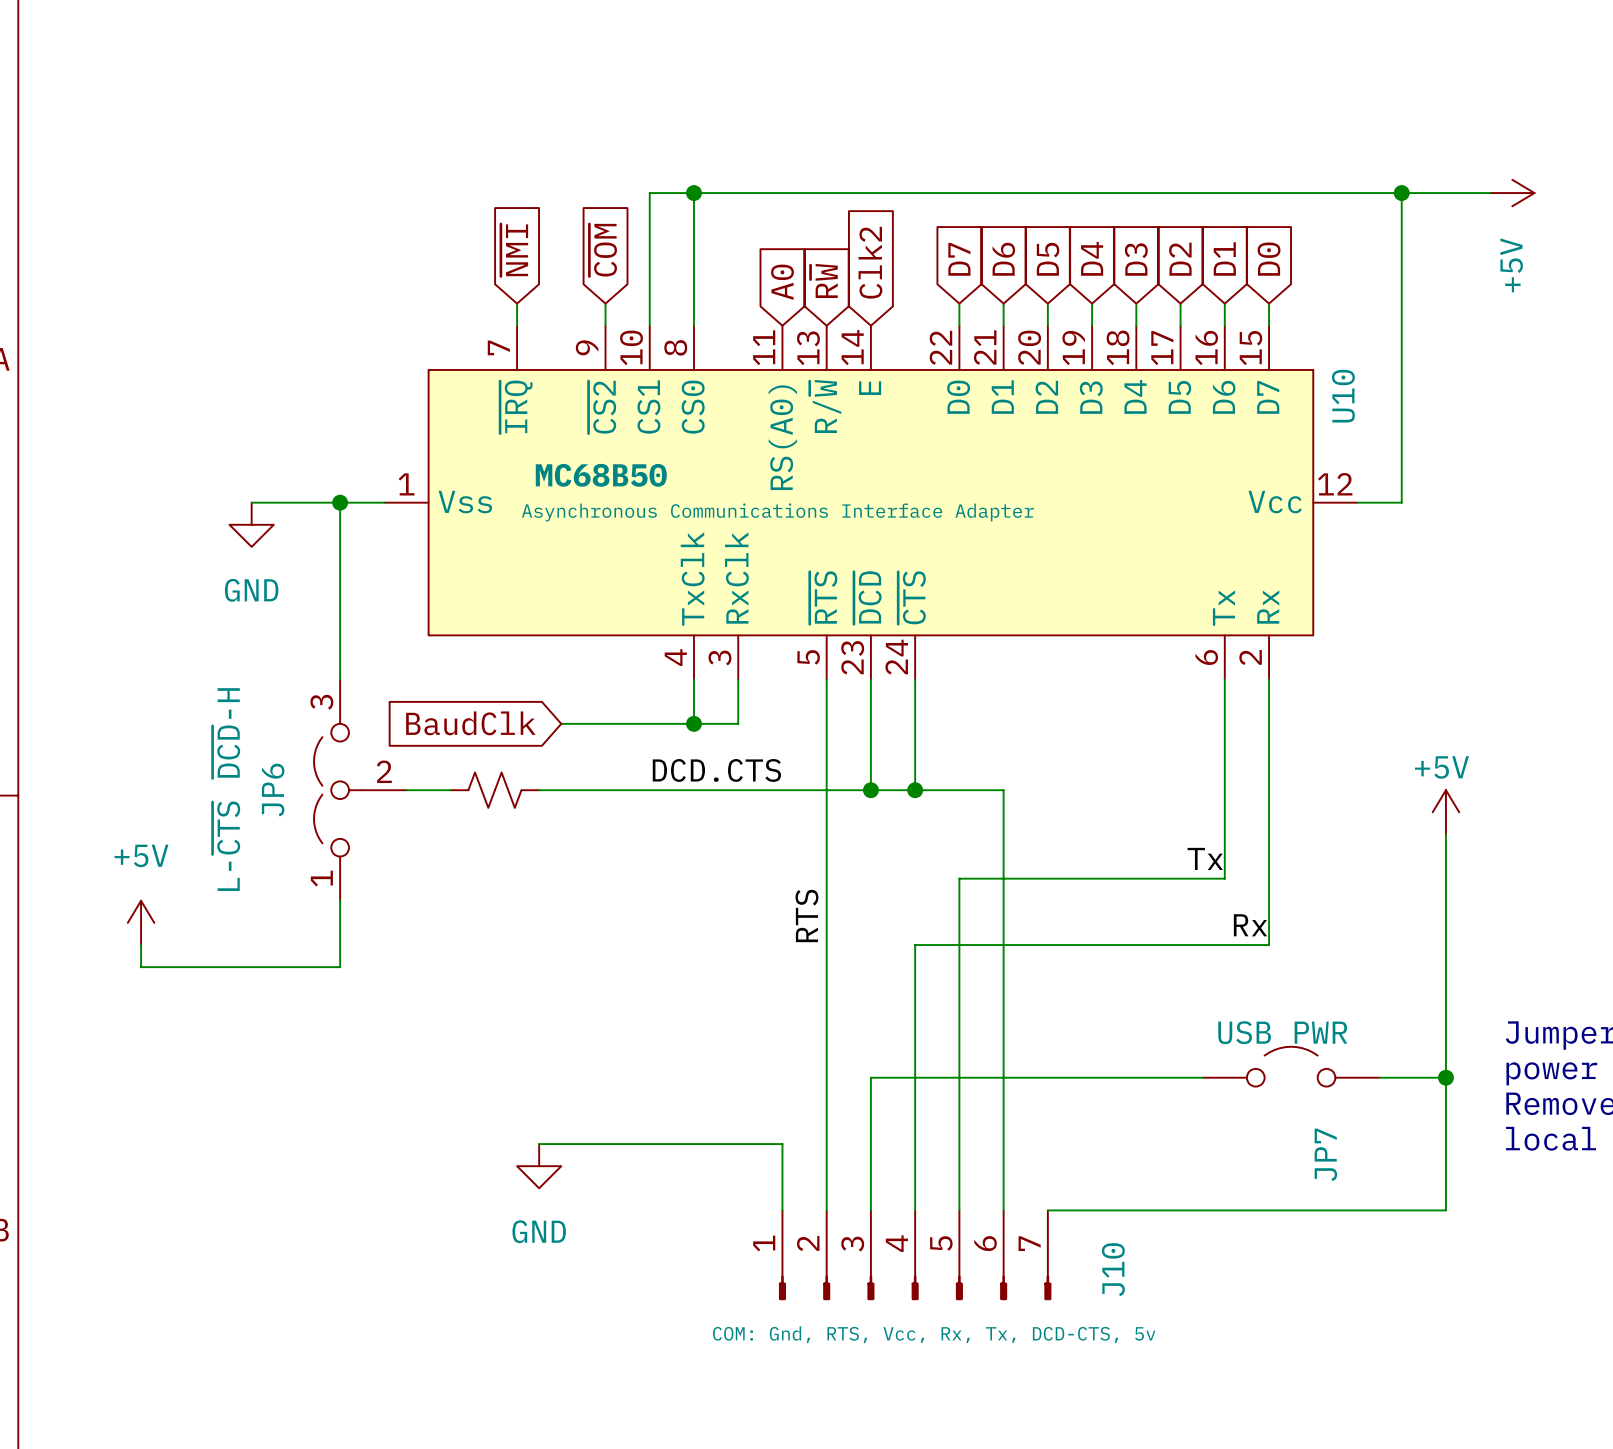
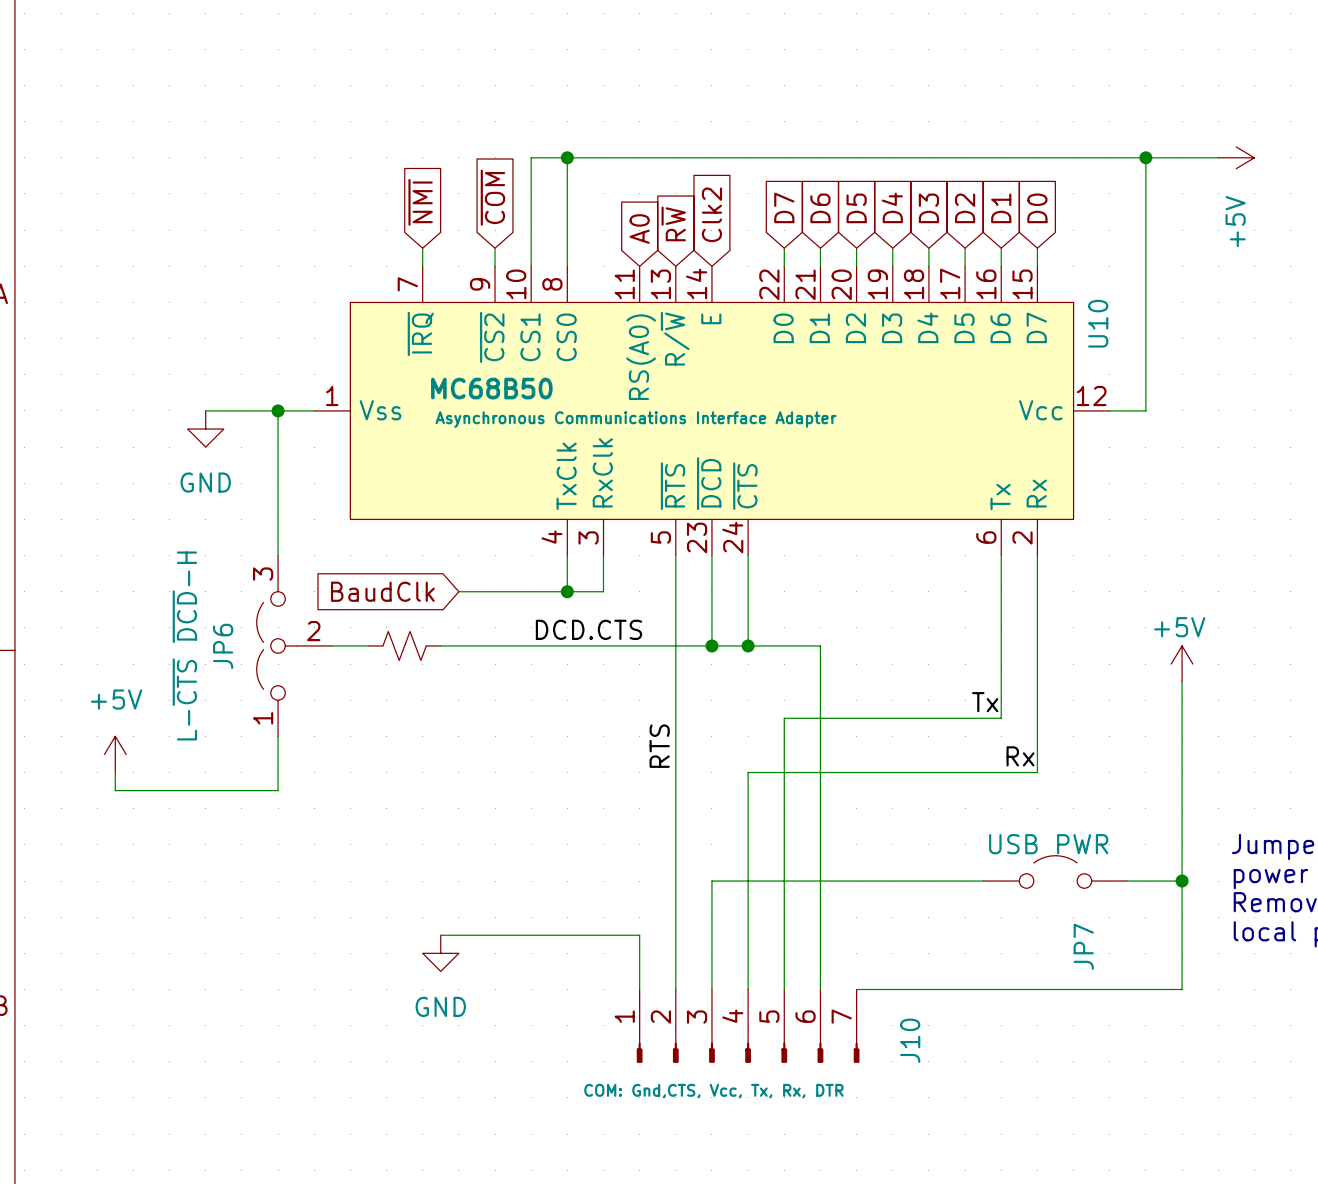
J10 value: COM: Gnd, RTS, Vcc, Rx, Tx, DCD-CTS, 5v (934, 1334) -> COM: Gnd,CTS, Vcc, Tx, Rx, DTR (713, 1091)

